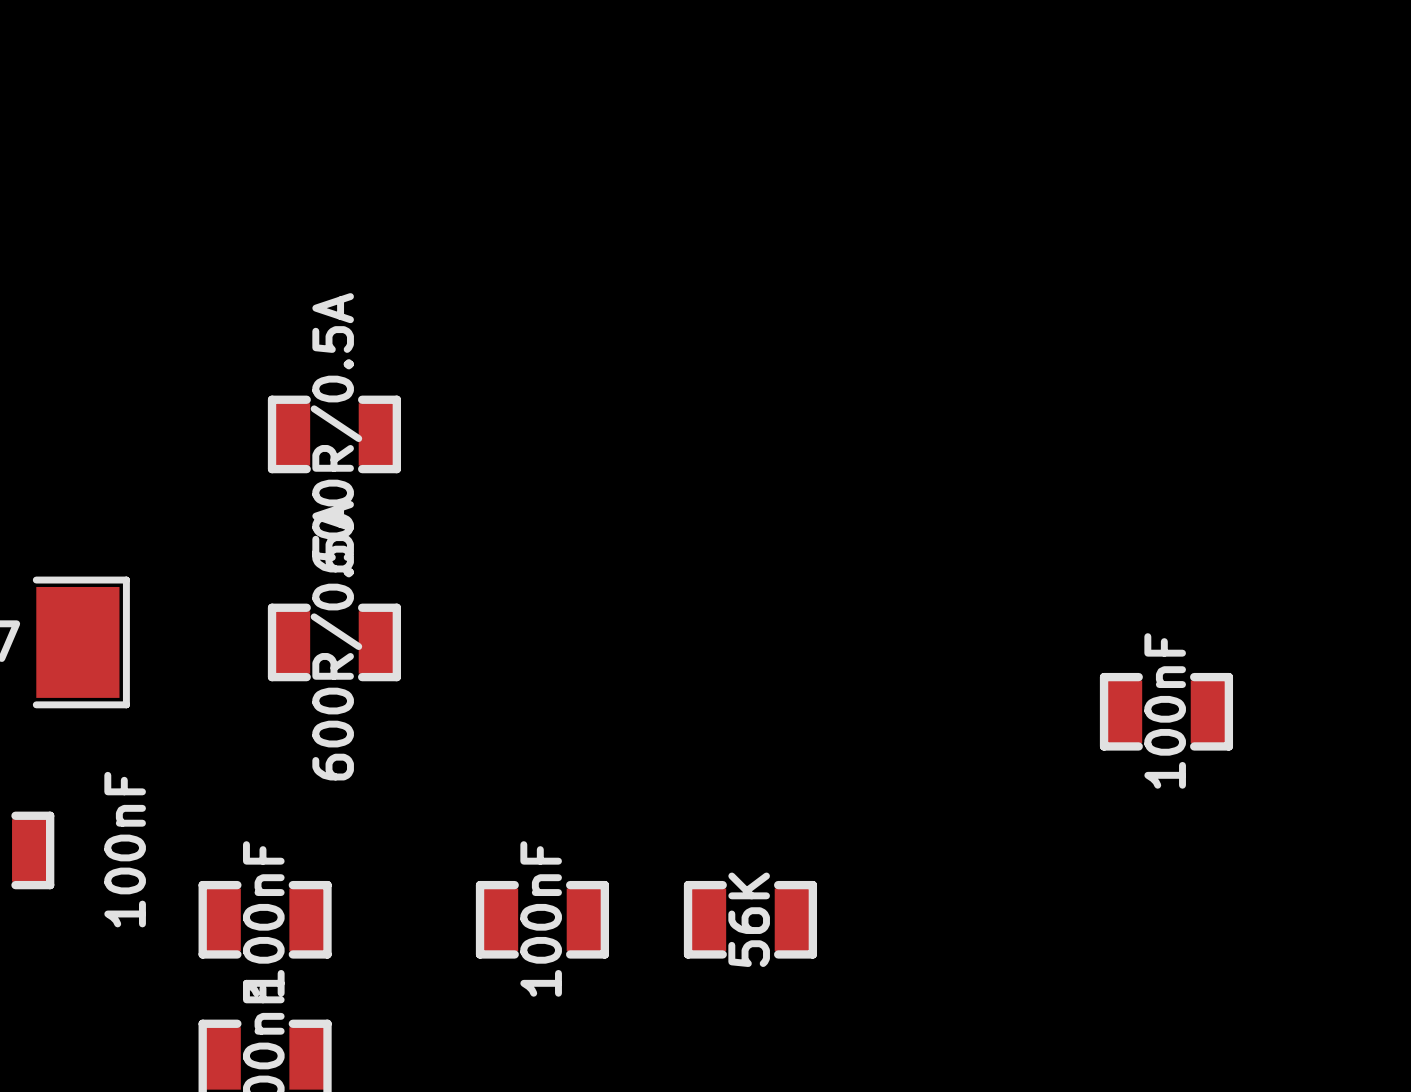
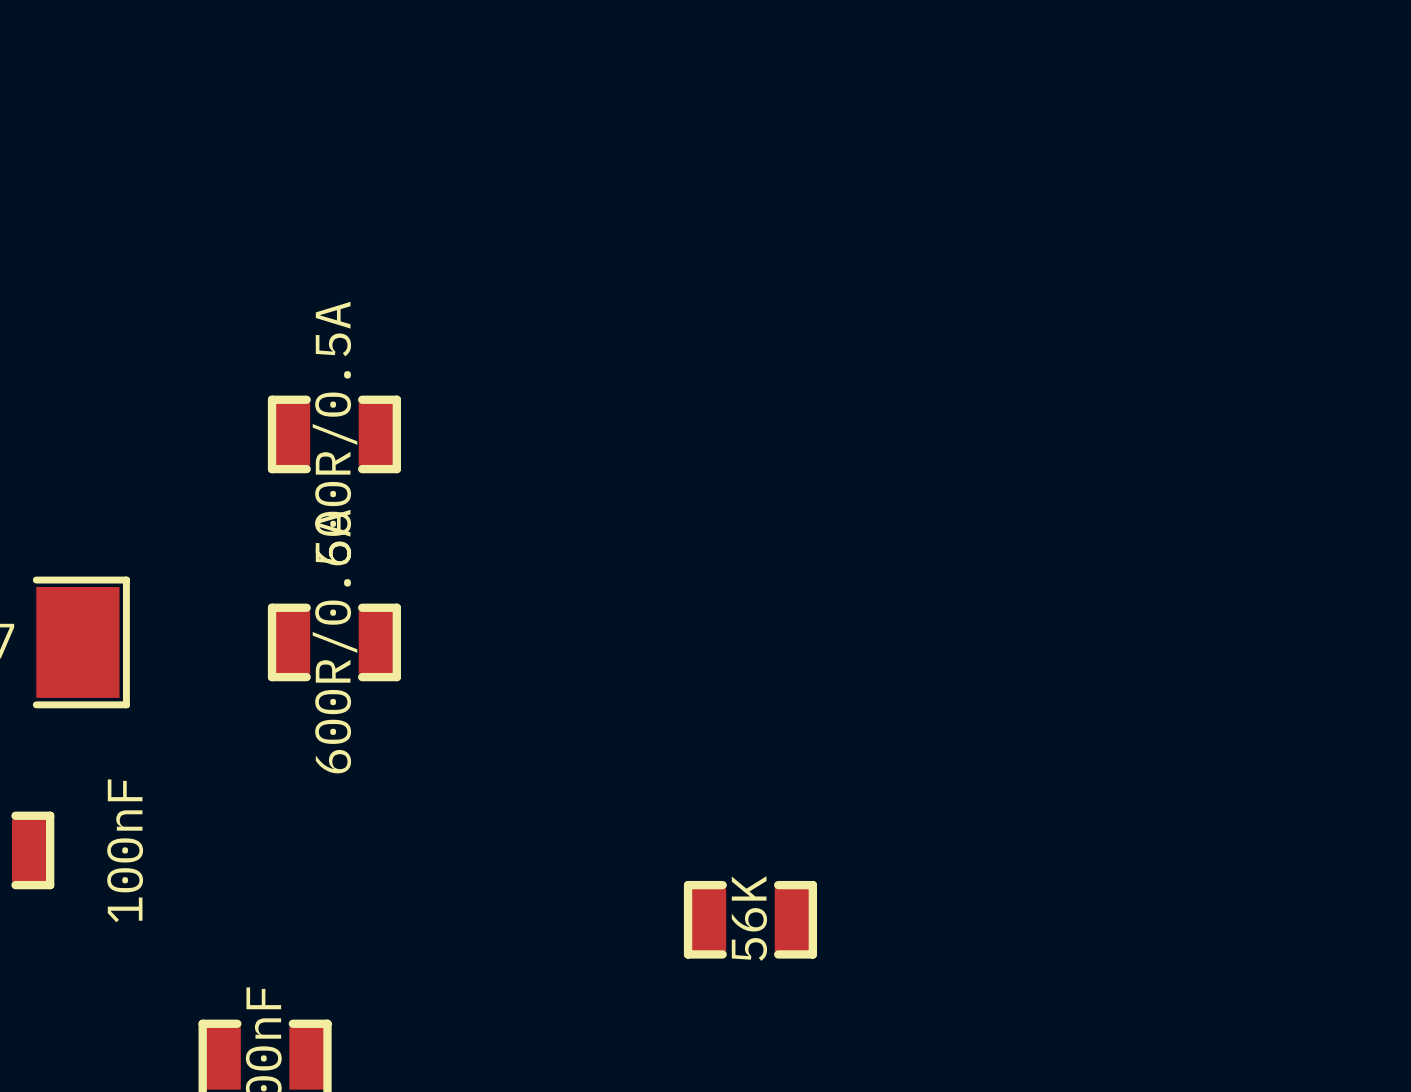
part: 100nF (1166, 711) -> none
part: 100nF (265, 919) -> none
part: 100nF (542, 919) -> none

